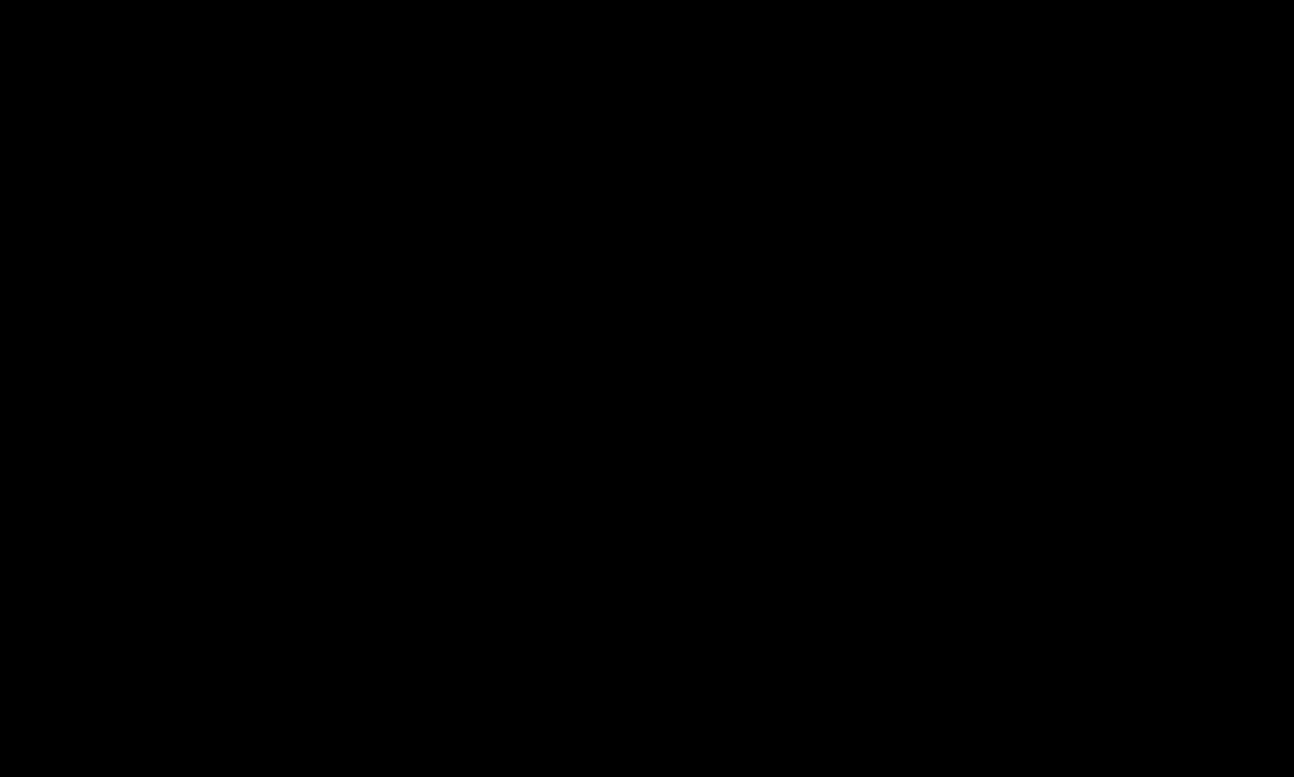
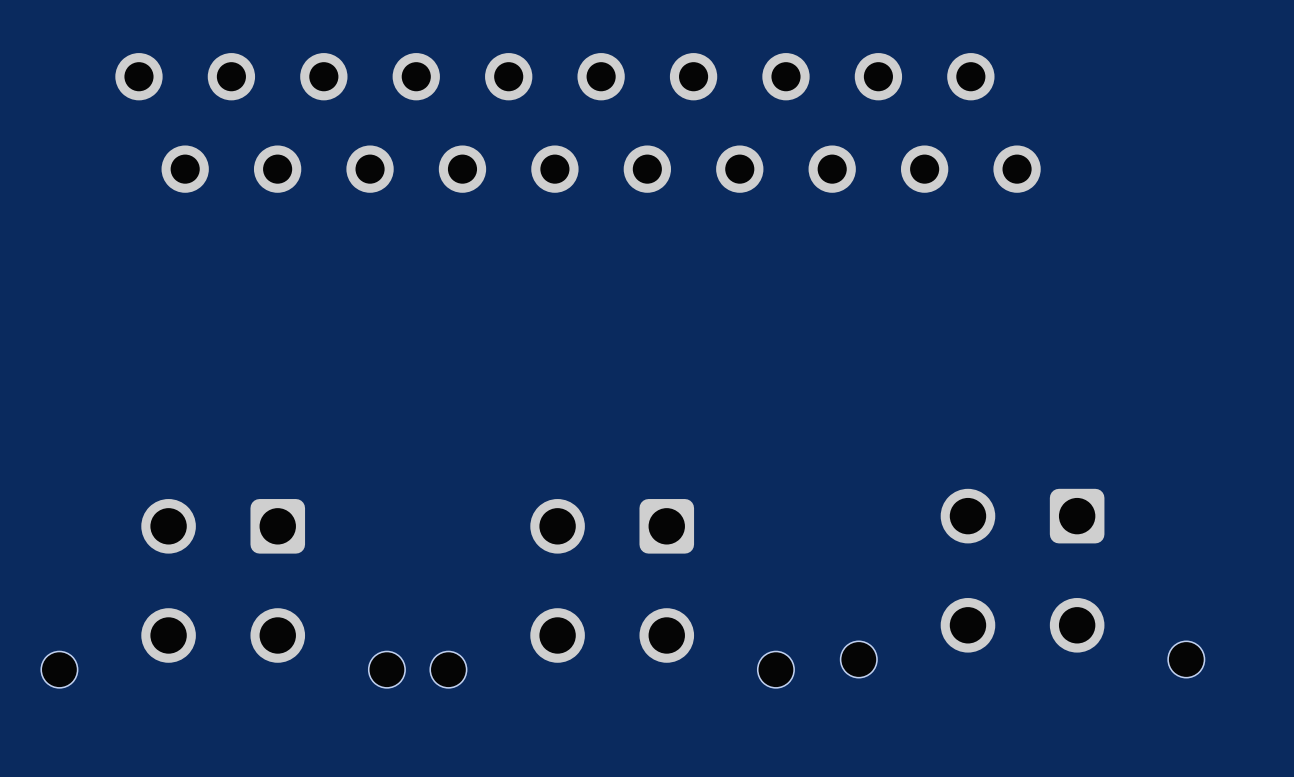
part: none -> (578, 122)
part: none -> (1022, 583)
part: none -> (223, 593)
part: none -> (612, 593)

